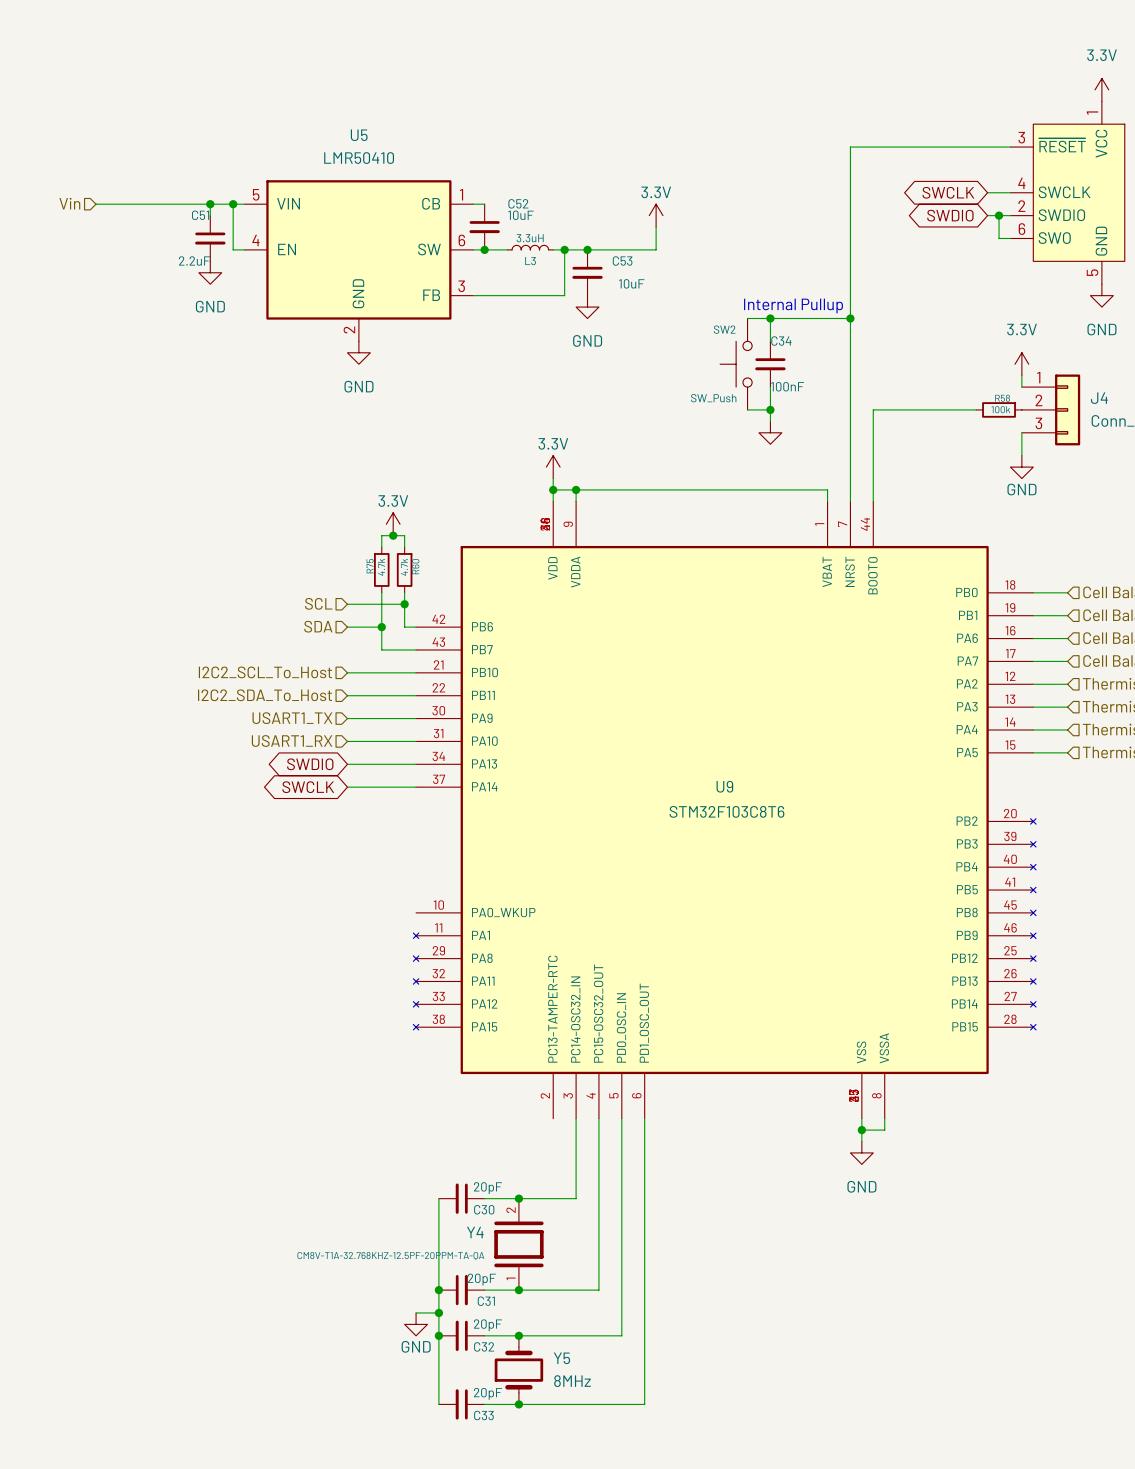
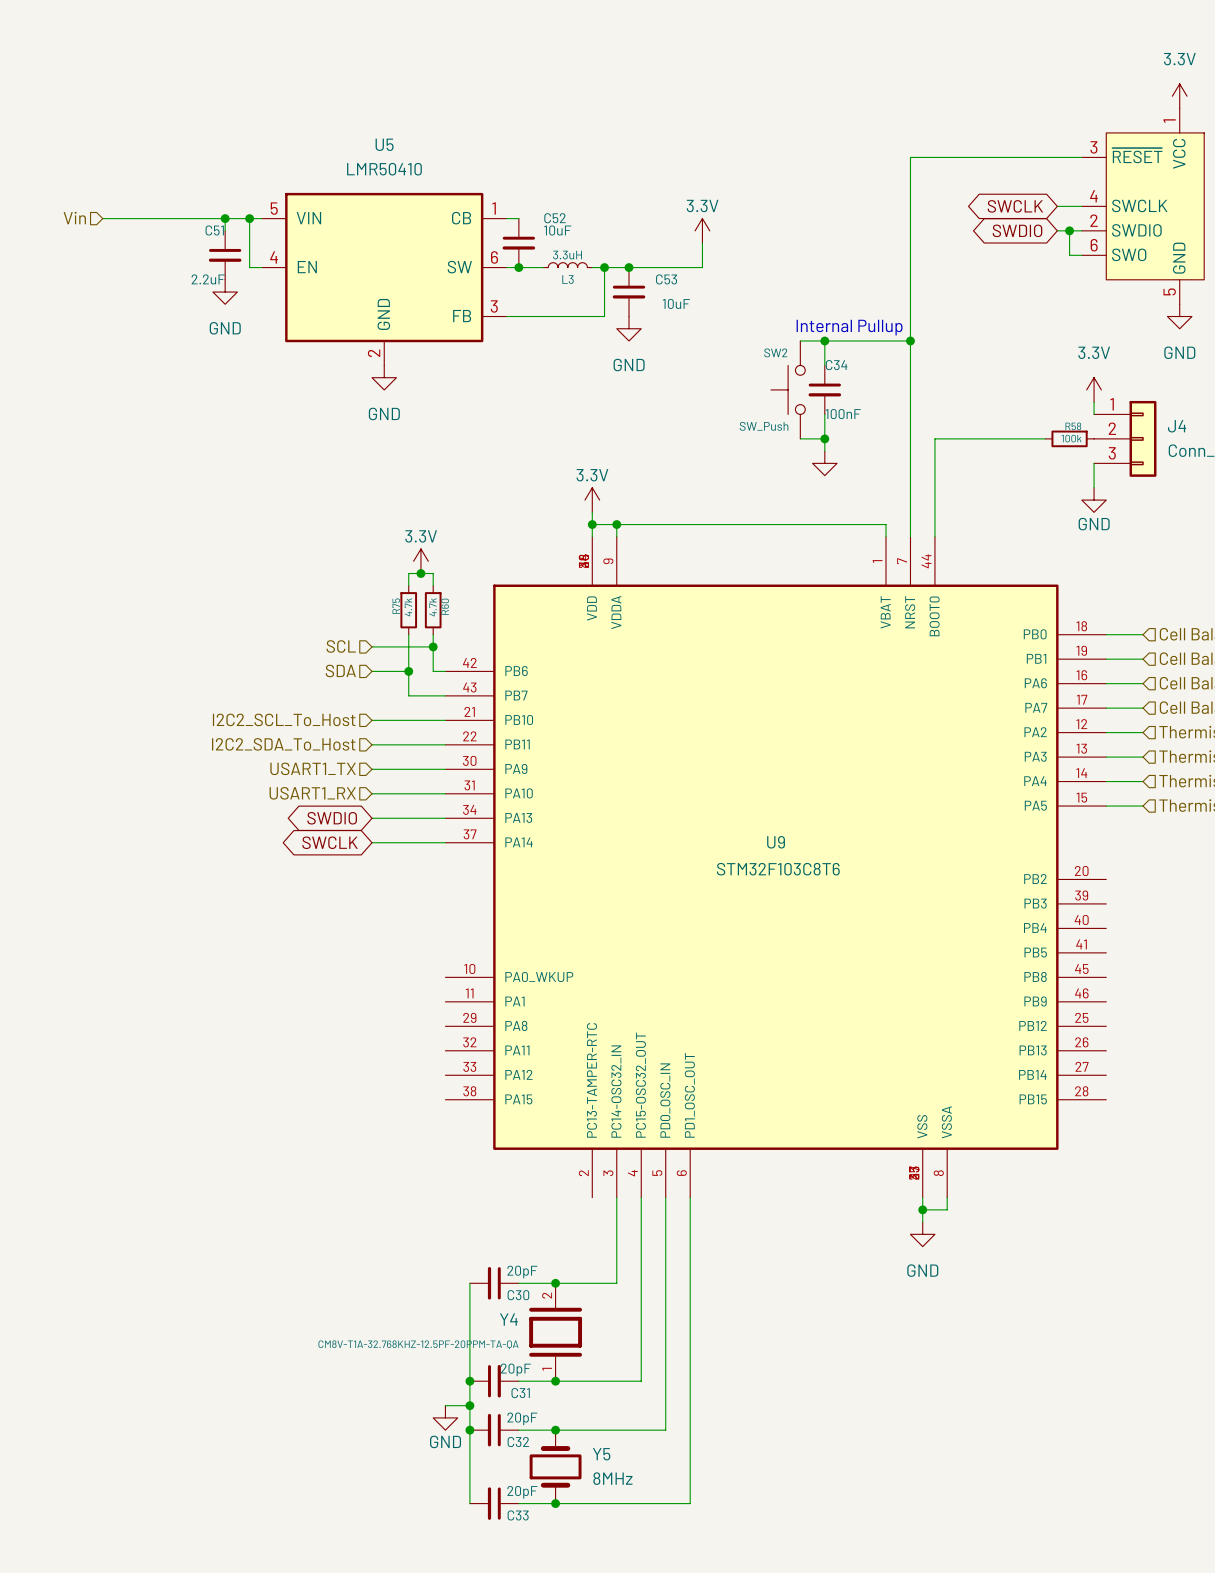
U9 symbol: [413, 501, 1037, 1119] -> [445, 536, 1107, 1198]

